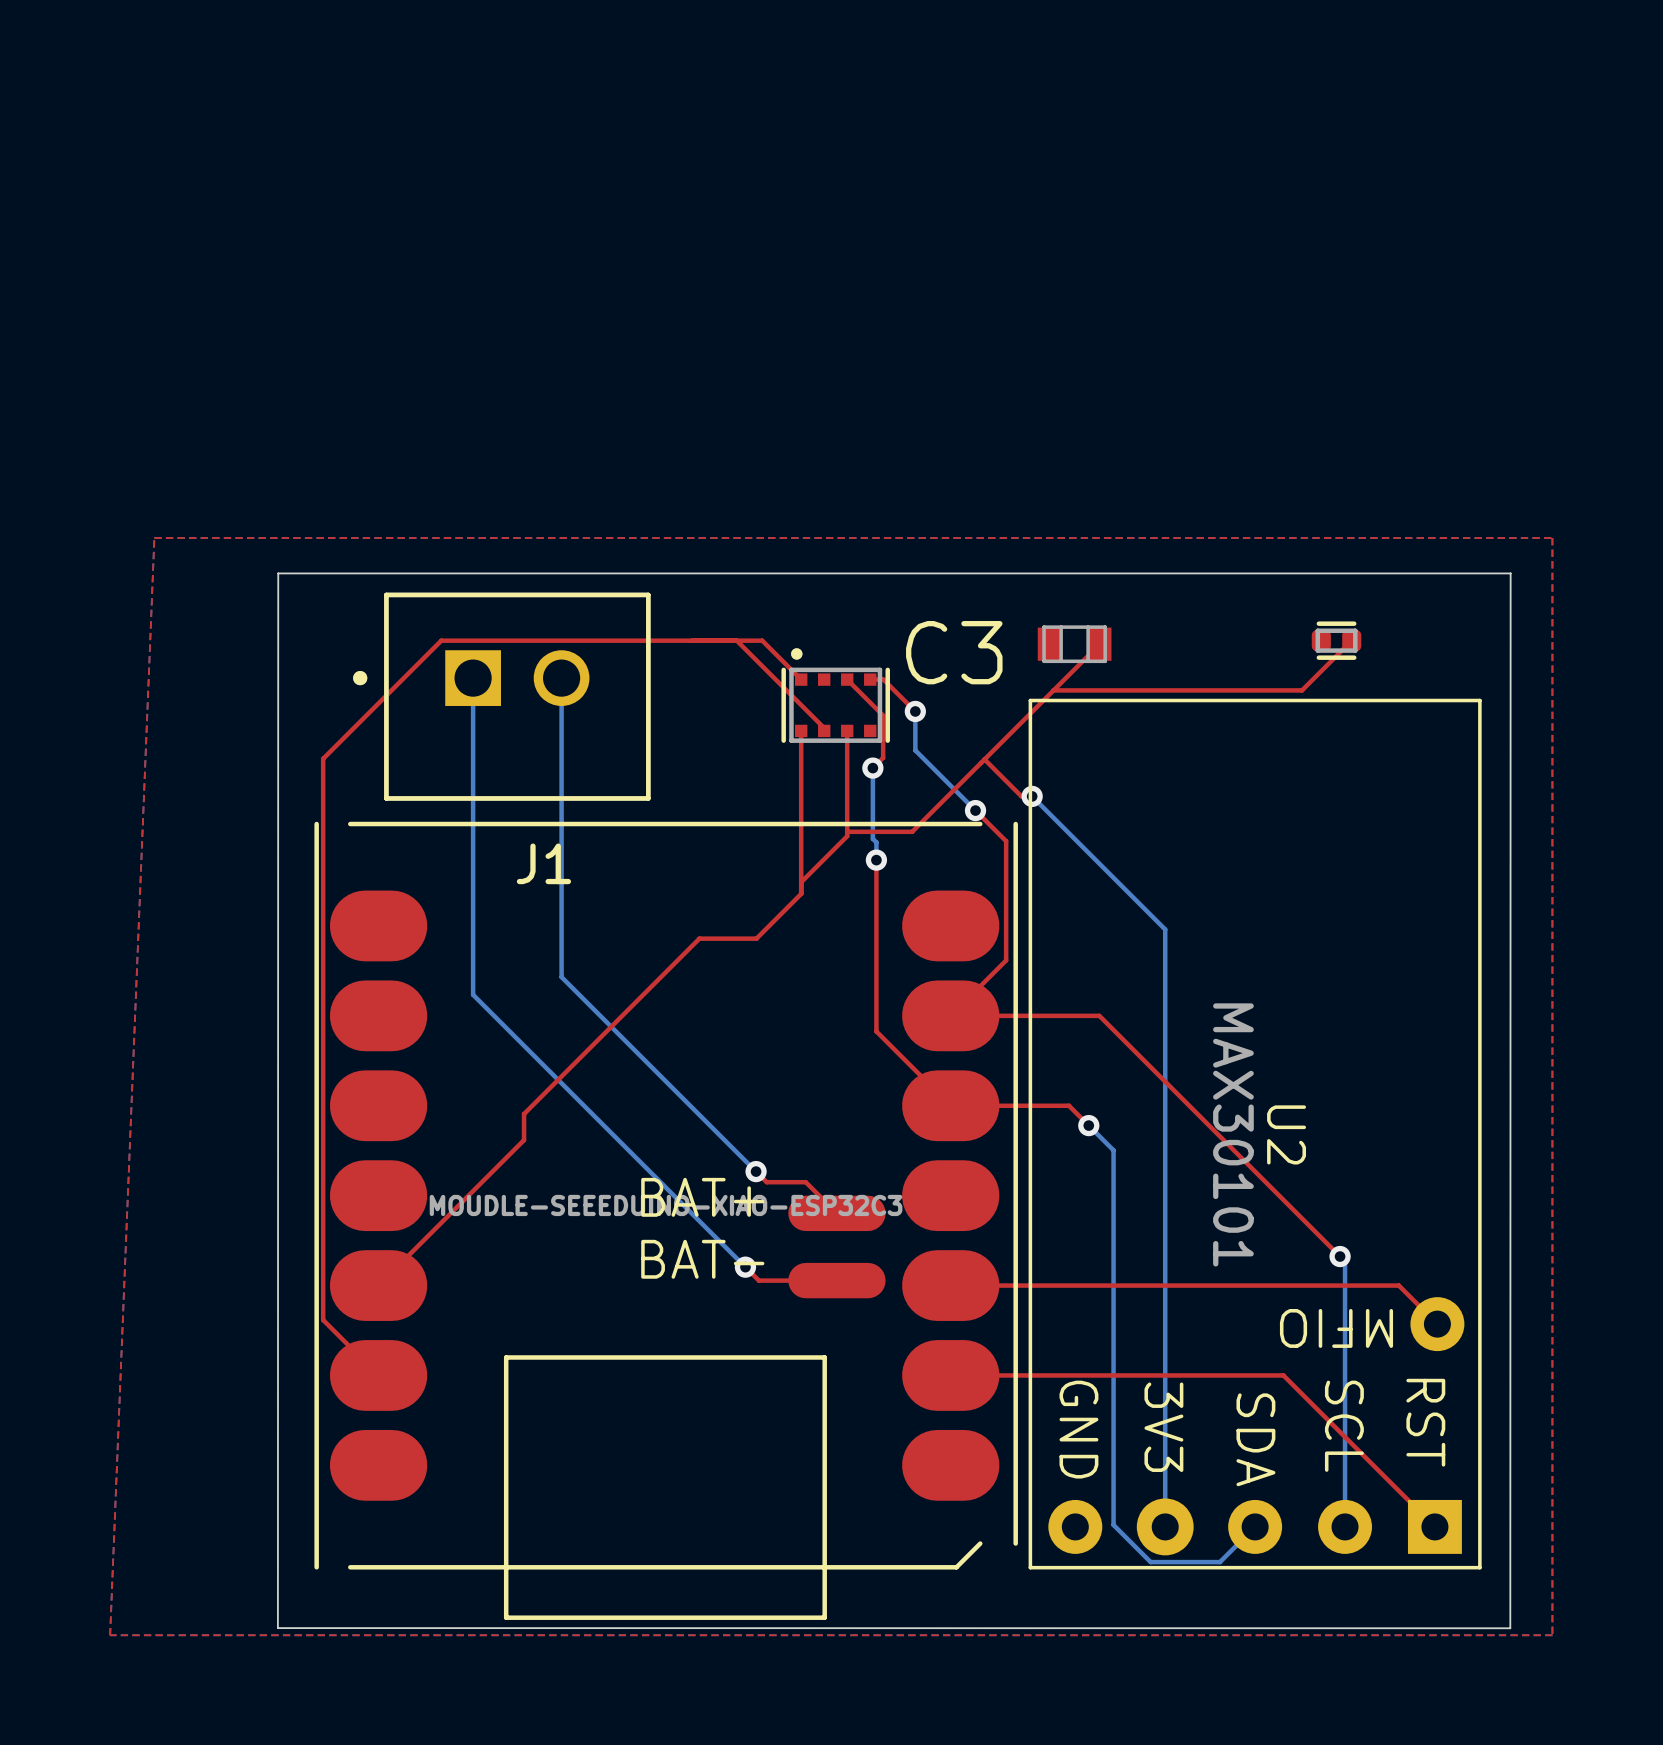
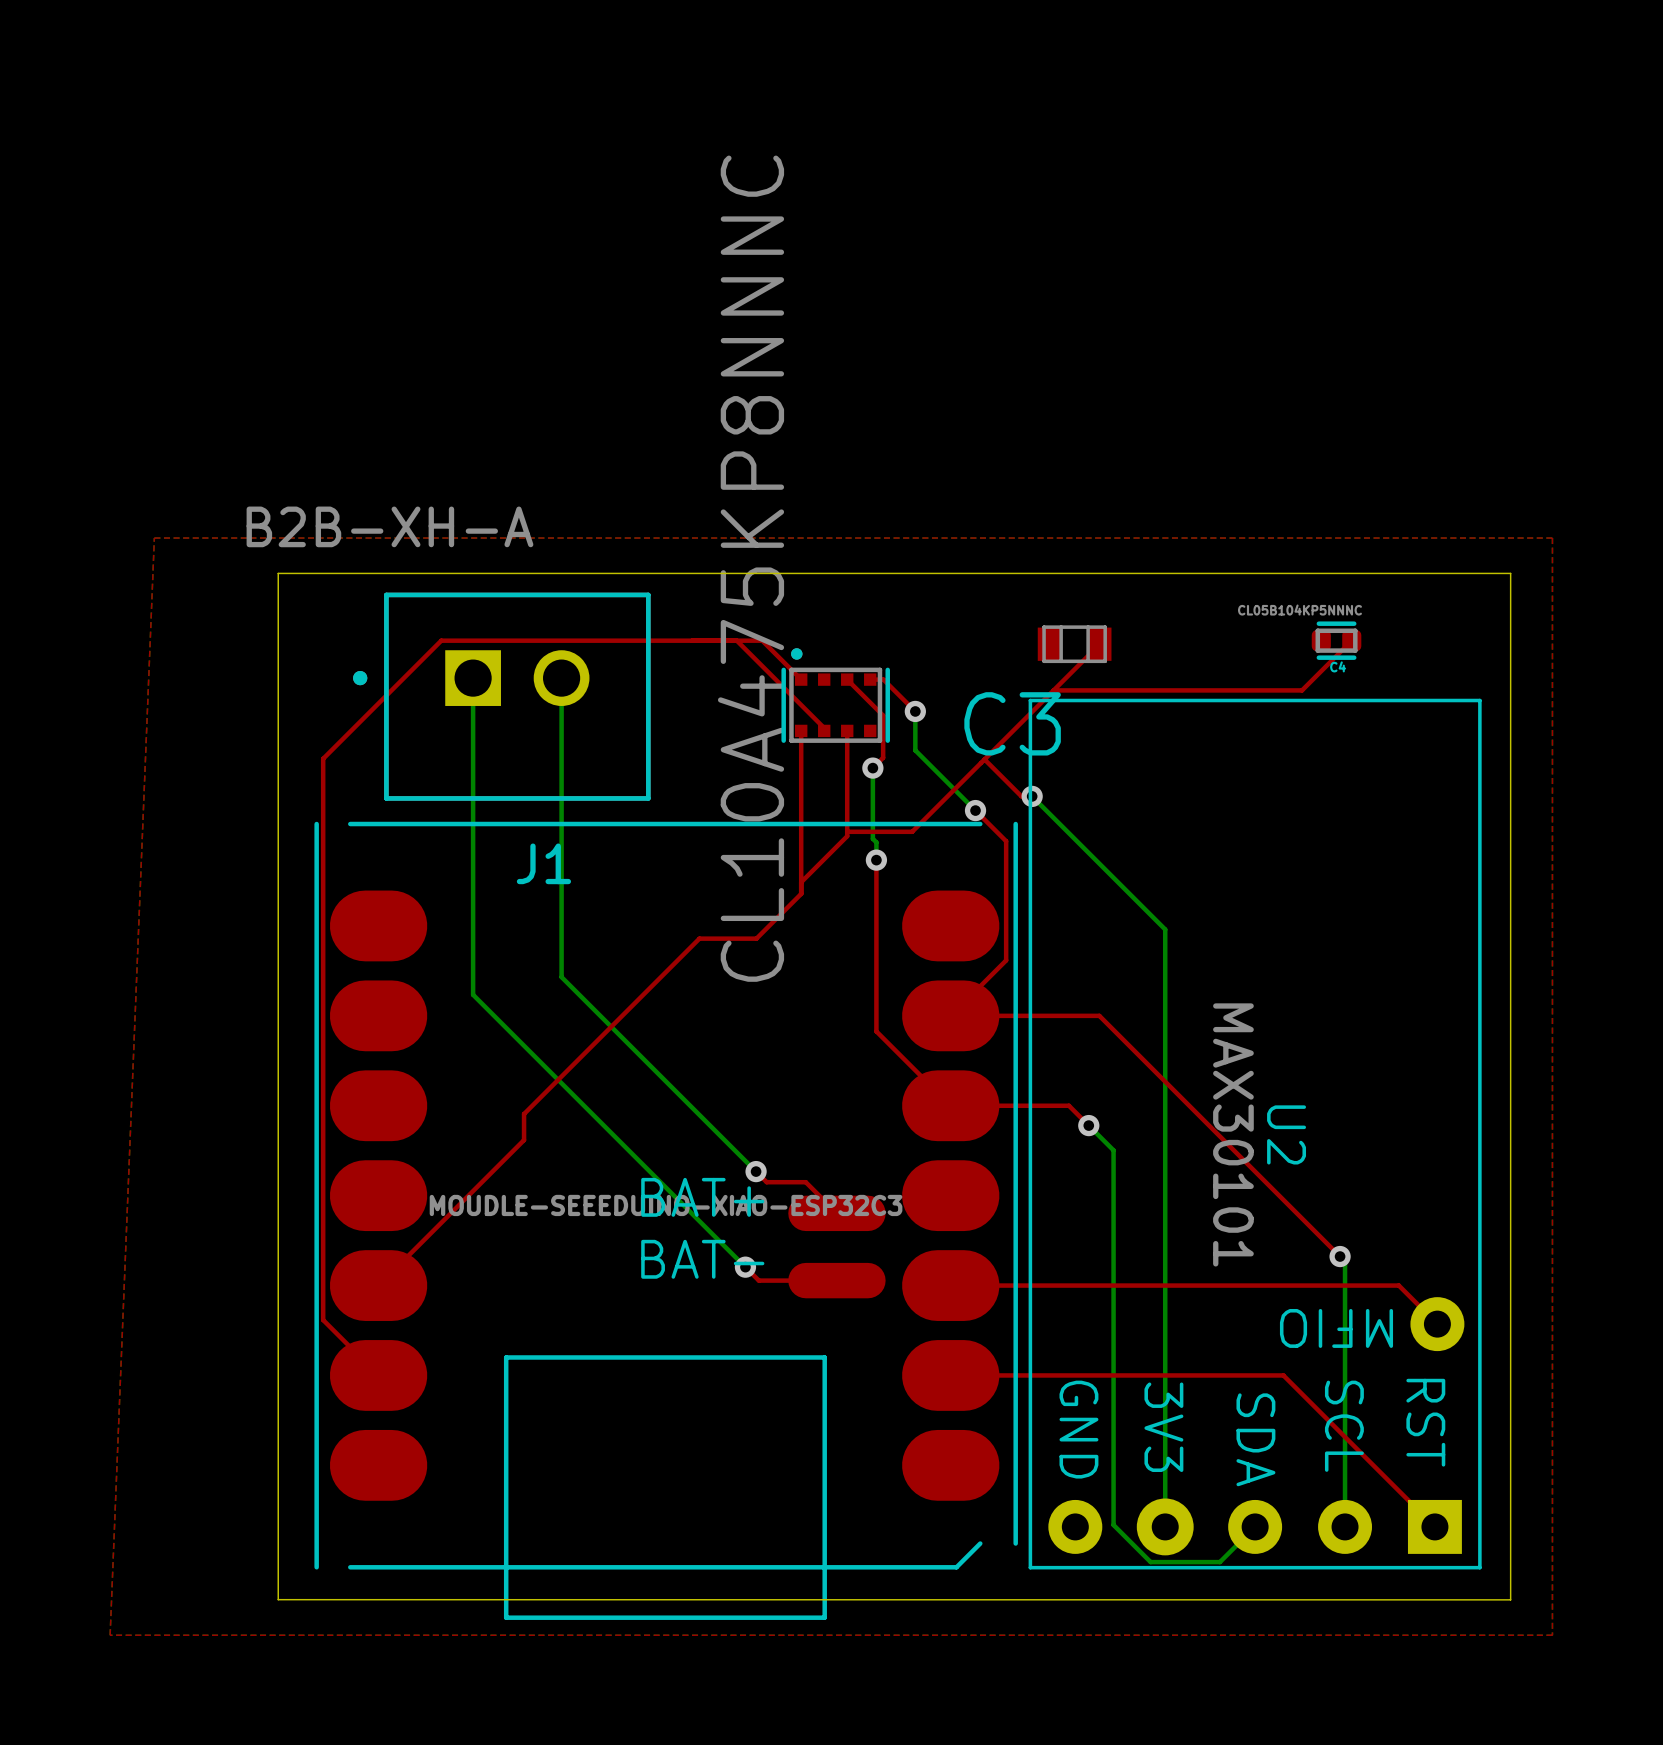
J1 value: none -> B2B-XH-A (389, 526)
C3 value: none -> CL10A475KP8NNNC (751, 568)
board edge: (278, 573) (277, 1628) (1510, 1628) (1510, 573) -> (278, 573) (278, 1599) (1510, 1599) (1510, 573)
C4 value: none -> CL05B104KP5NNNC (1299, 610)
C3 name position: C3 (954, 652) -> C3 (1012, 723)
C4 name: none -> C4 (1338, 666)

